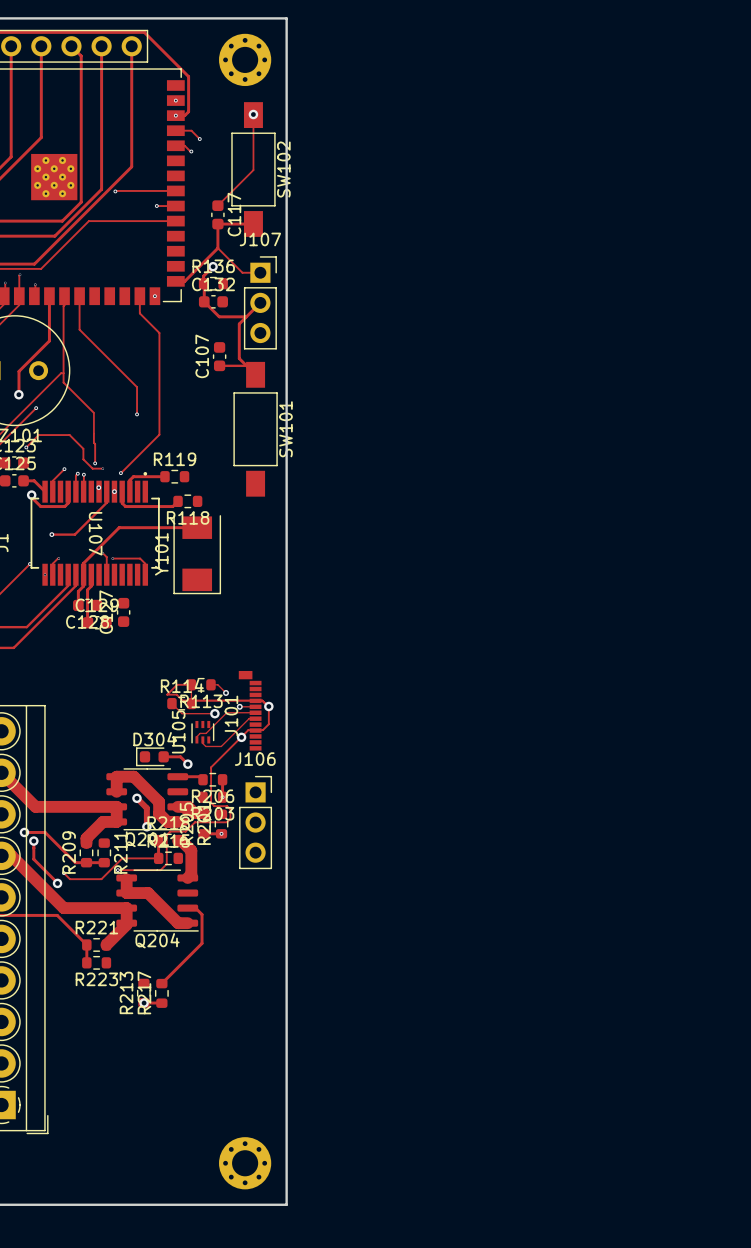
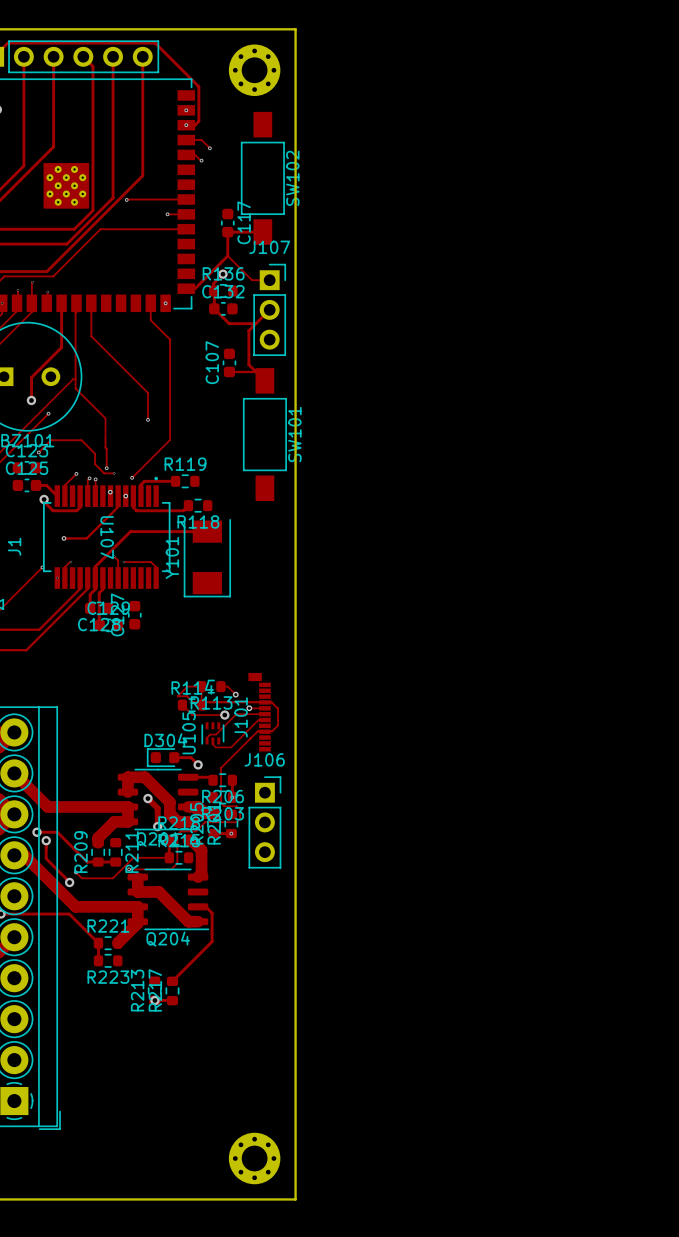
via: (253, 114) -> none
track: (253, 115) (253, 170) (217, 205) -> none
via: (268, 706) -> none
via: (241, 737) -> none

